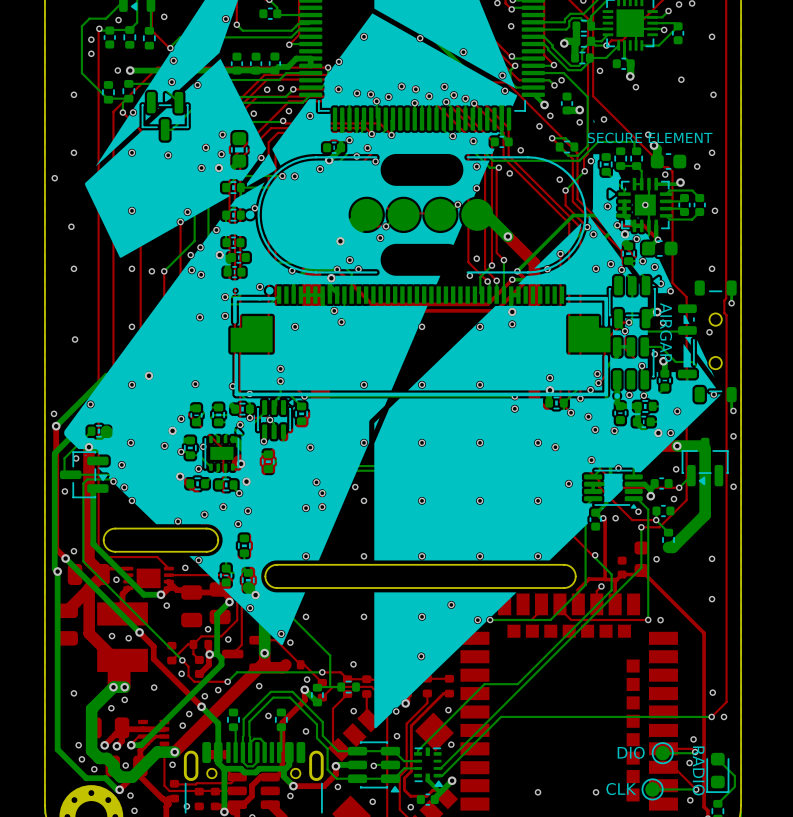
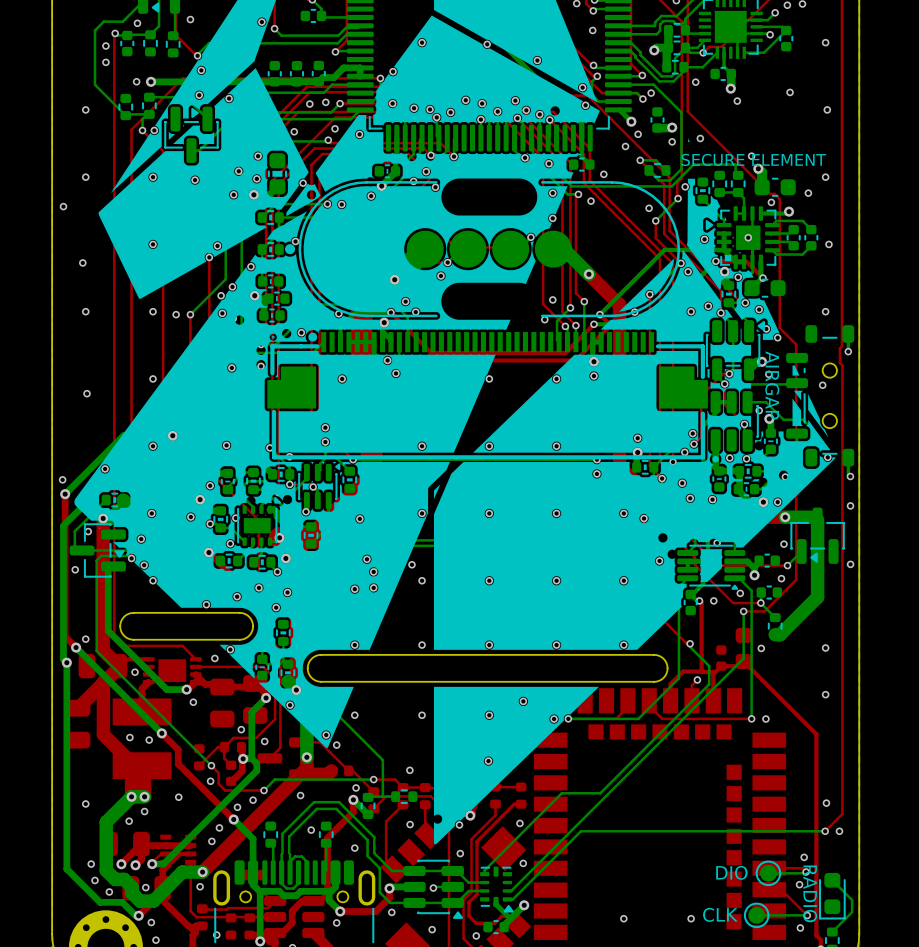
drawing shape: [321, 13, 518, 109] -> [372, 15, 600, 126]
drawing shape: [64, 99, 502, 646] -> [74, 114, 582, 748]
drawing shape: [246, 153, 277, 187] -> [286, 183, 321, 217]
drawing shape: [374, 318, 721, 561] -> [433, 368, 836, 650]
drawing: none -> [755, 431, 764, 444]
drawing: none -> [751, 479, 760, 482]
drawing shape: [374, 592, 517, 729] -> [433, 686, 599, 845]

